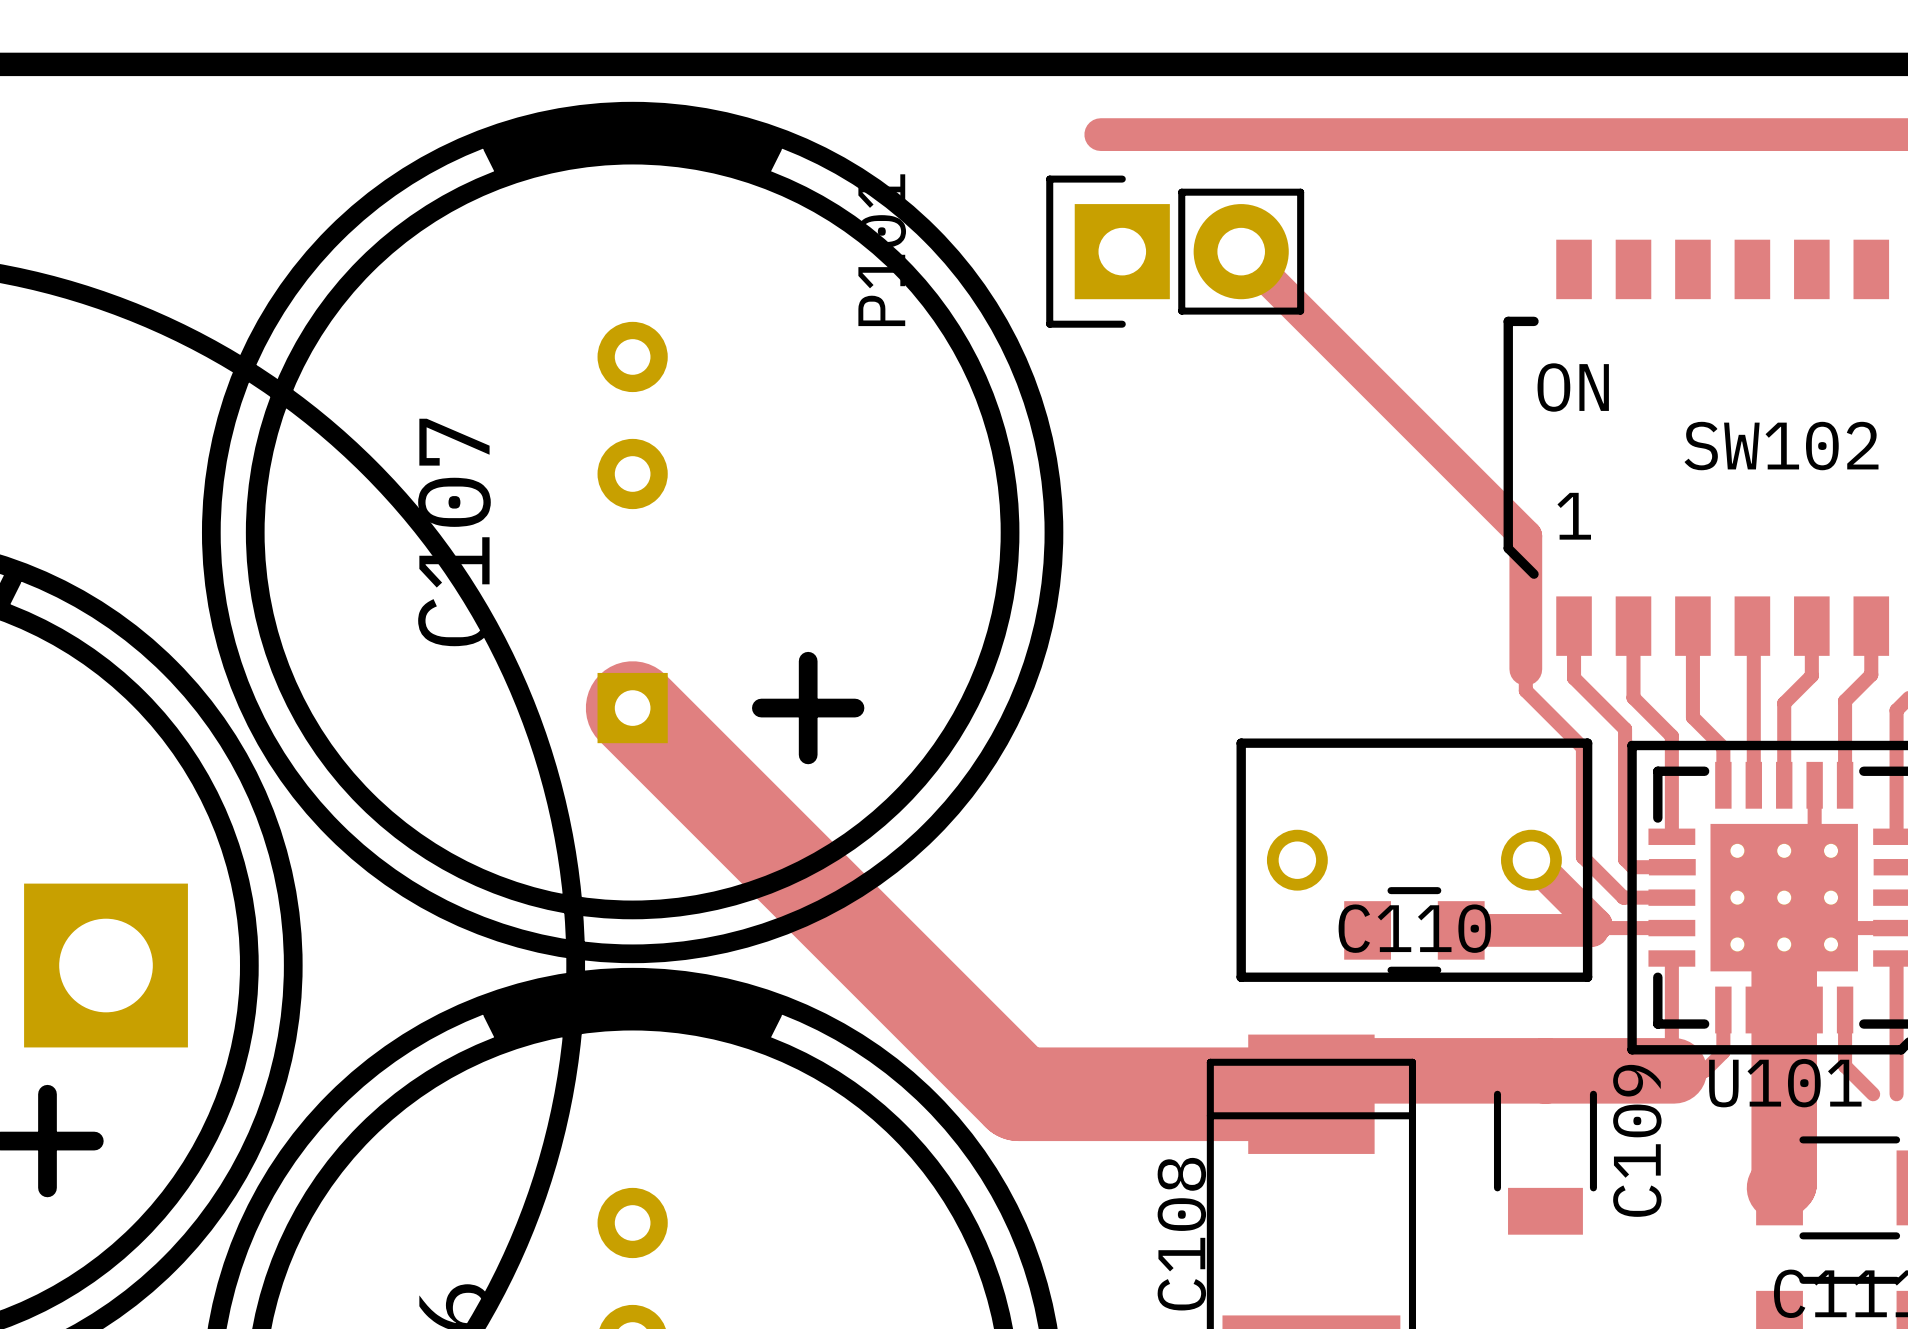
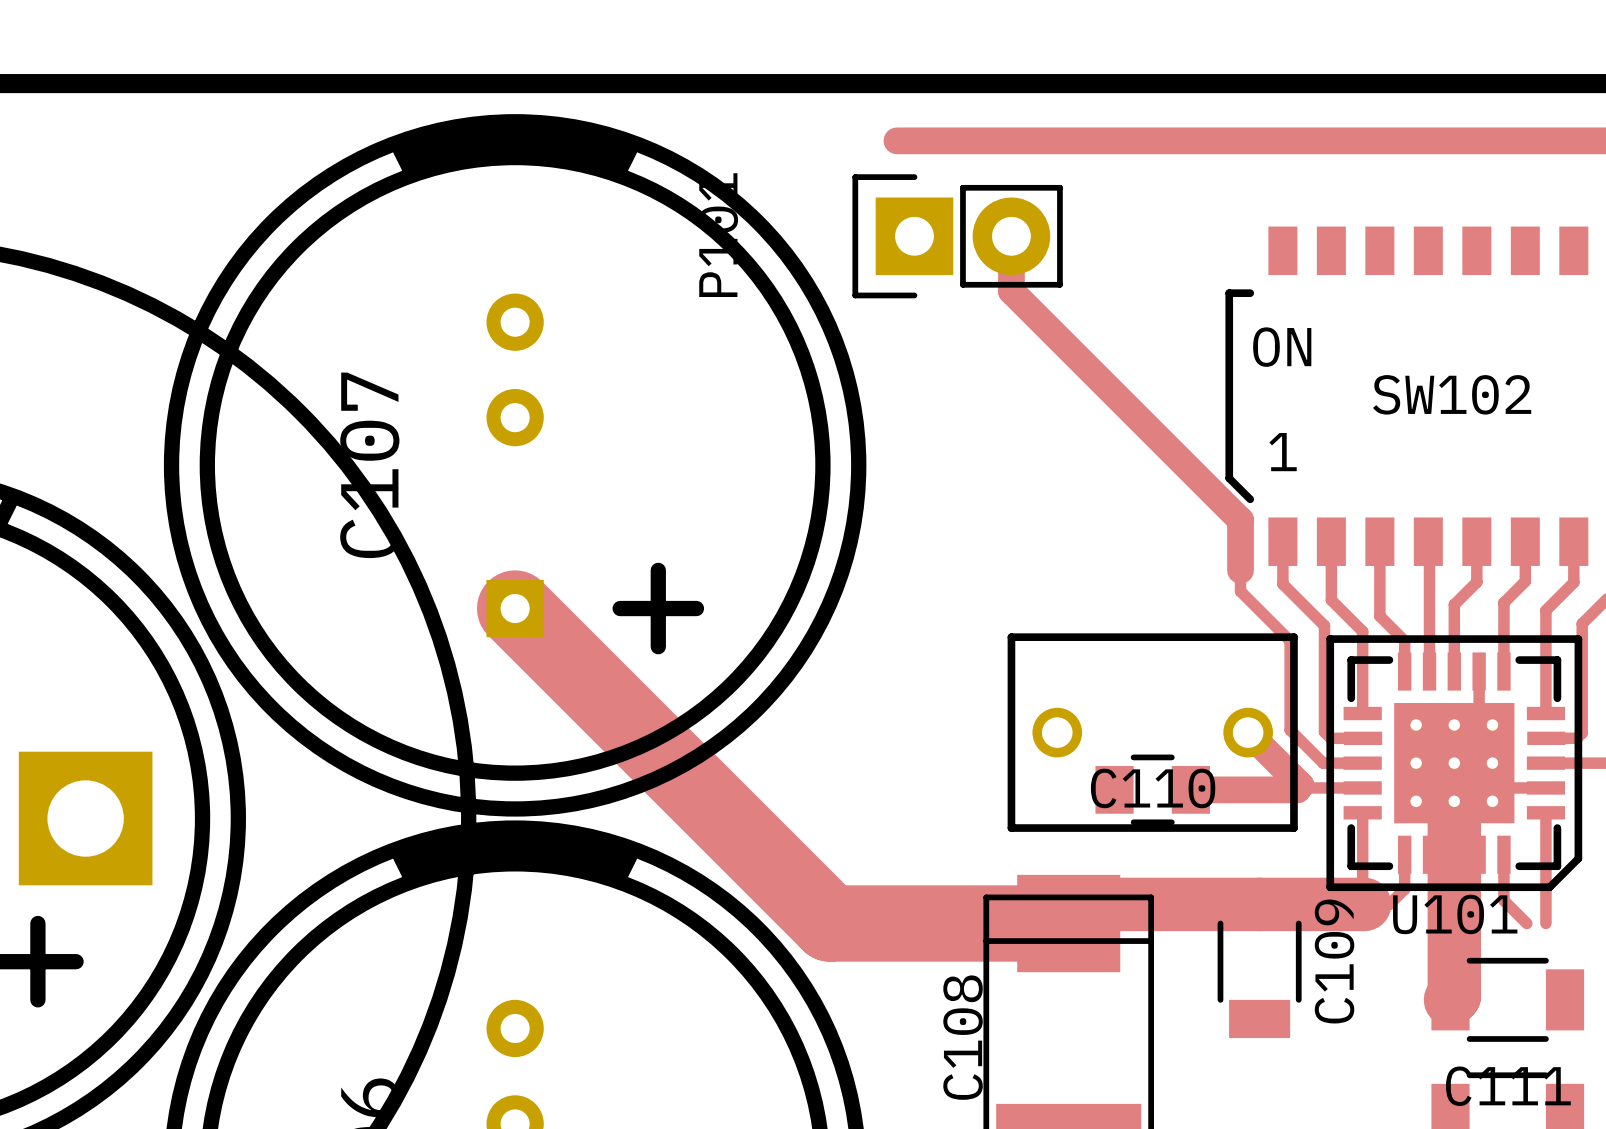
track: (1241, 251) (1525, 536) (1525, 690) -> (1011, 236) (1011, 291) (1240, 520) (1240, 591) (1243, 594)

